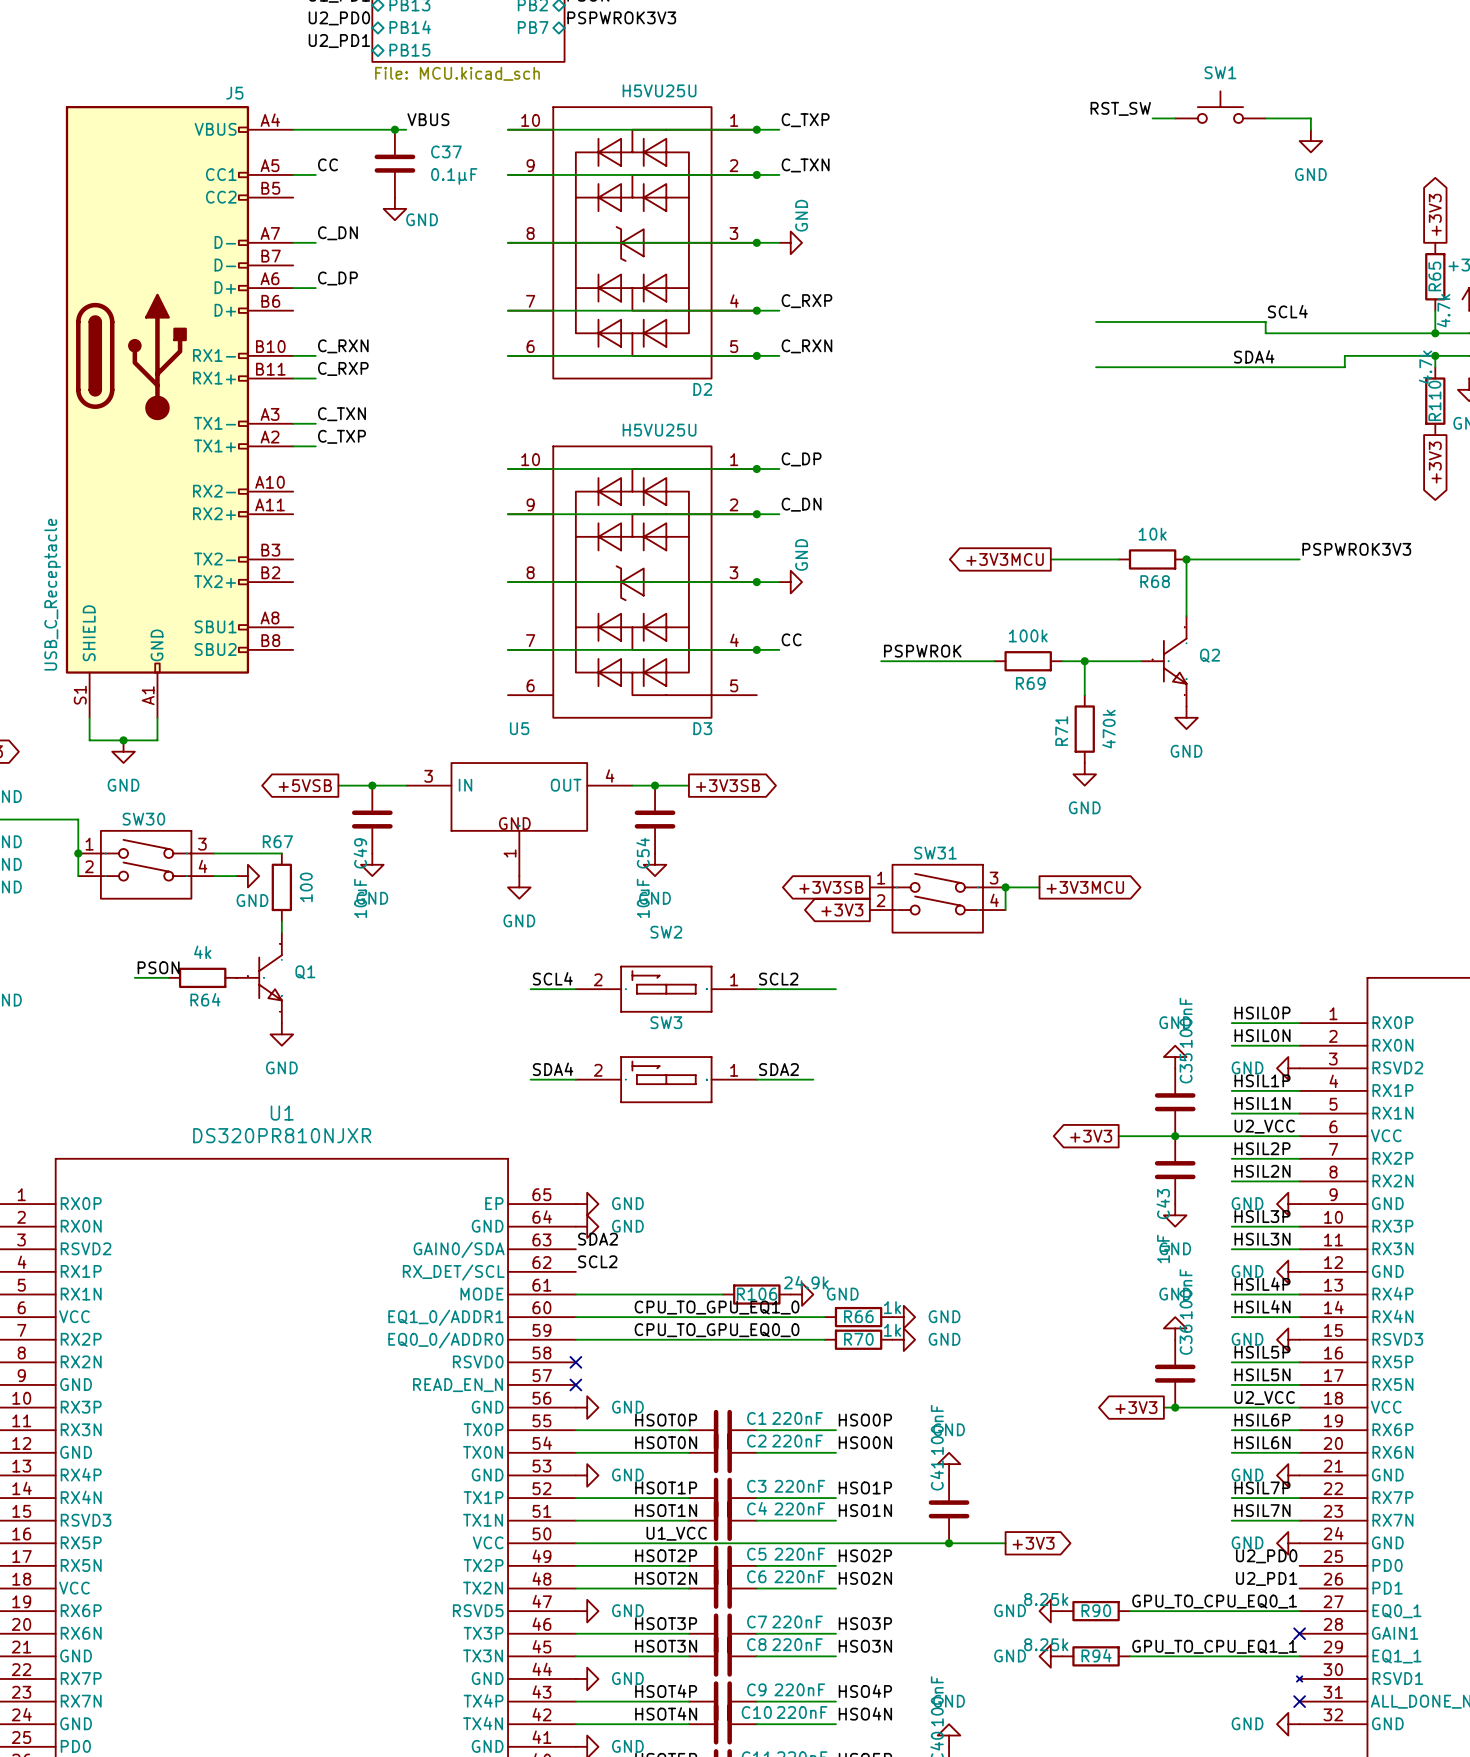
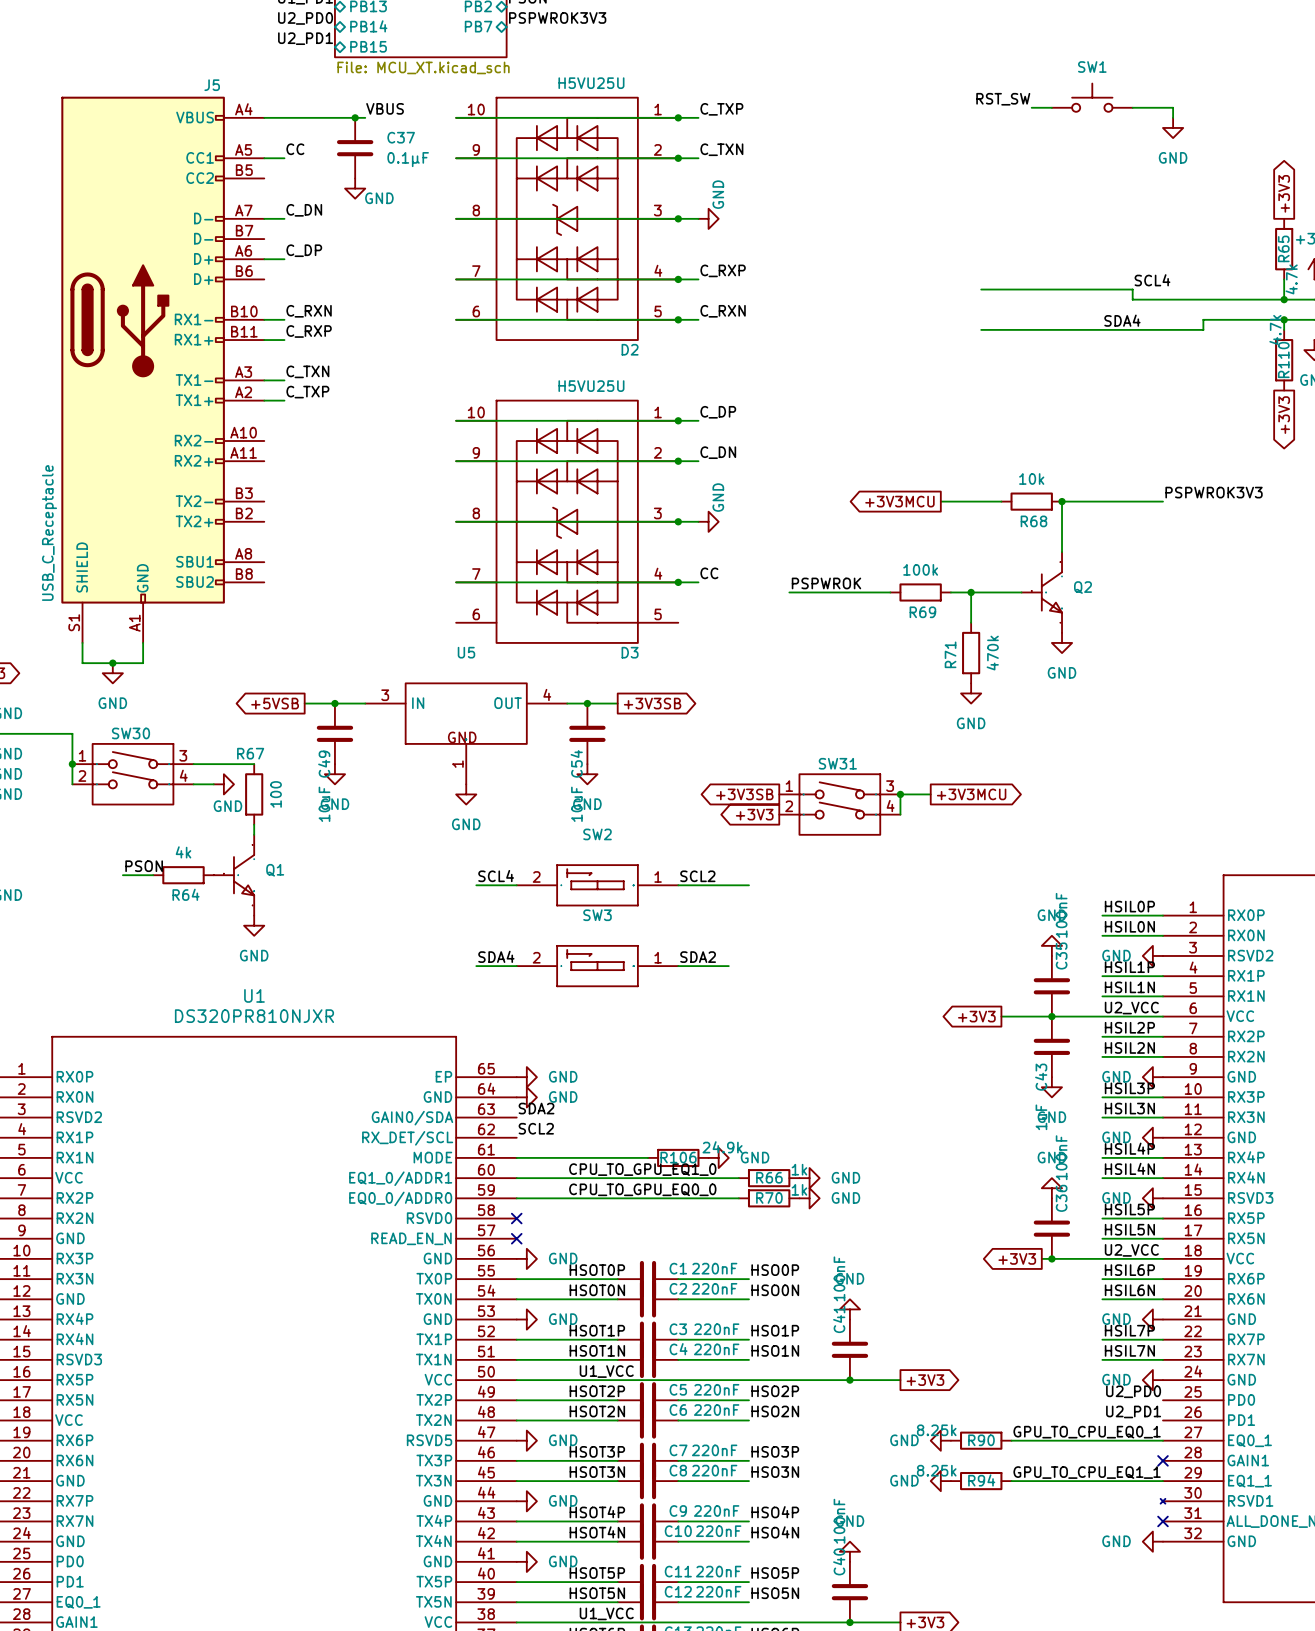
sheet value: File: MCU.kicad_sch (457, 73) -> File: MCU_XT.kicad_sch (423, 67)

